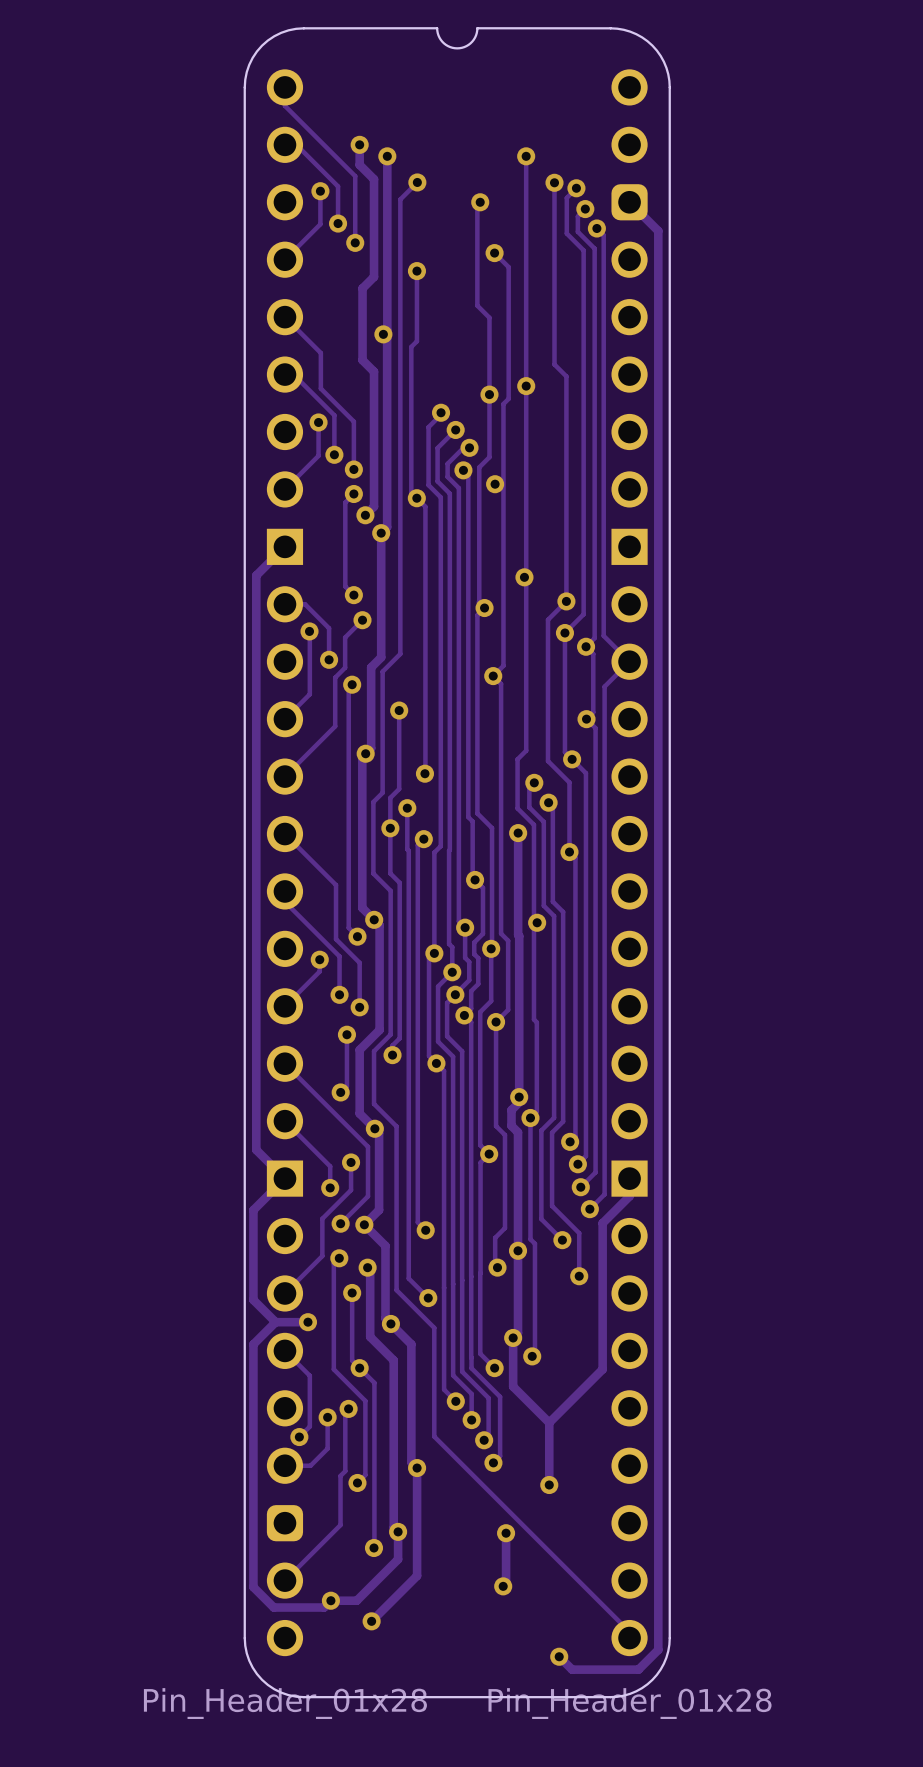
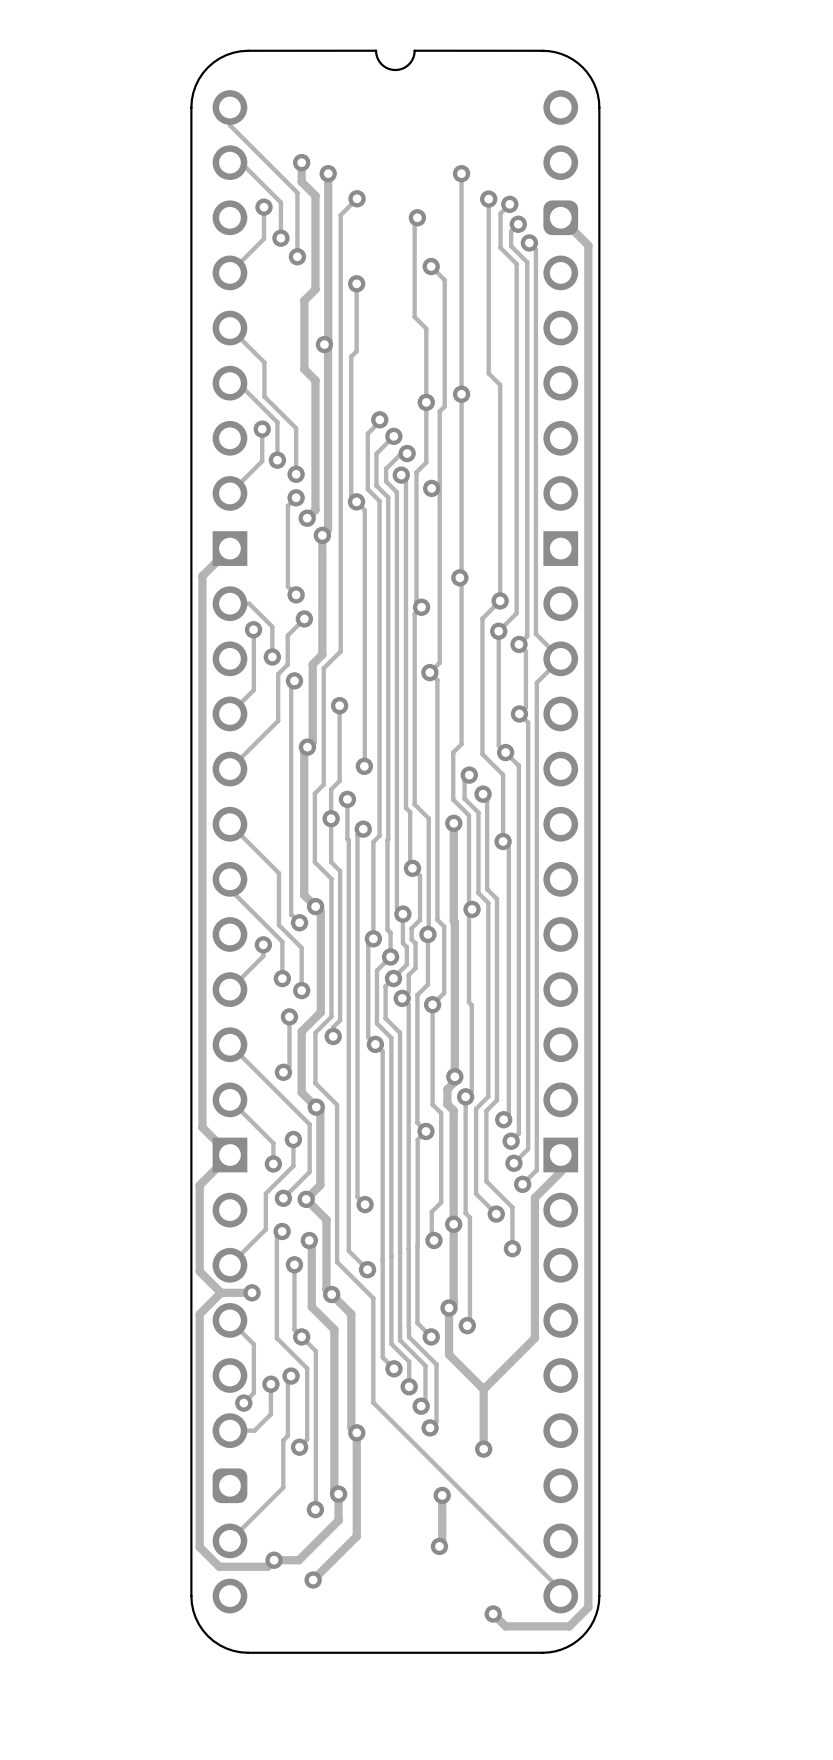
drawing: [143, 1688, 772, 1720] -> none

